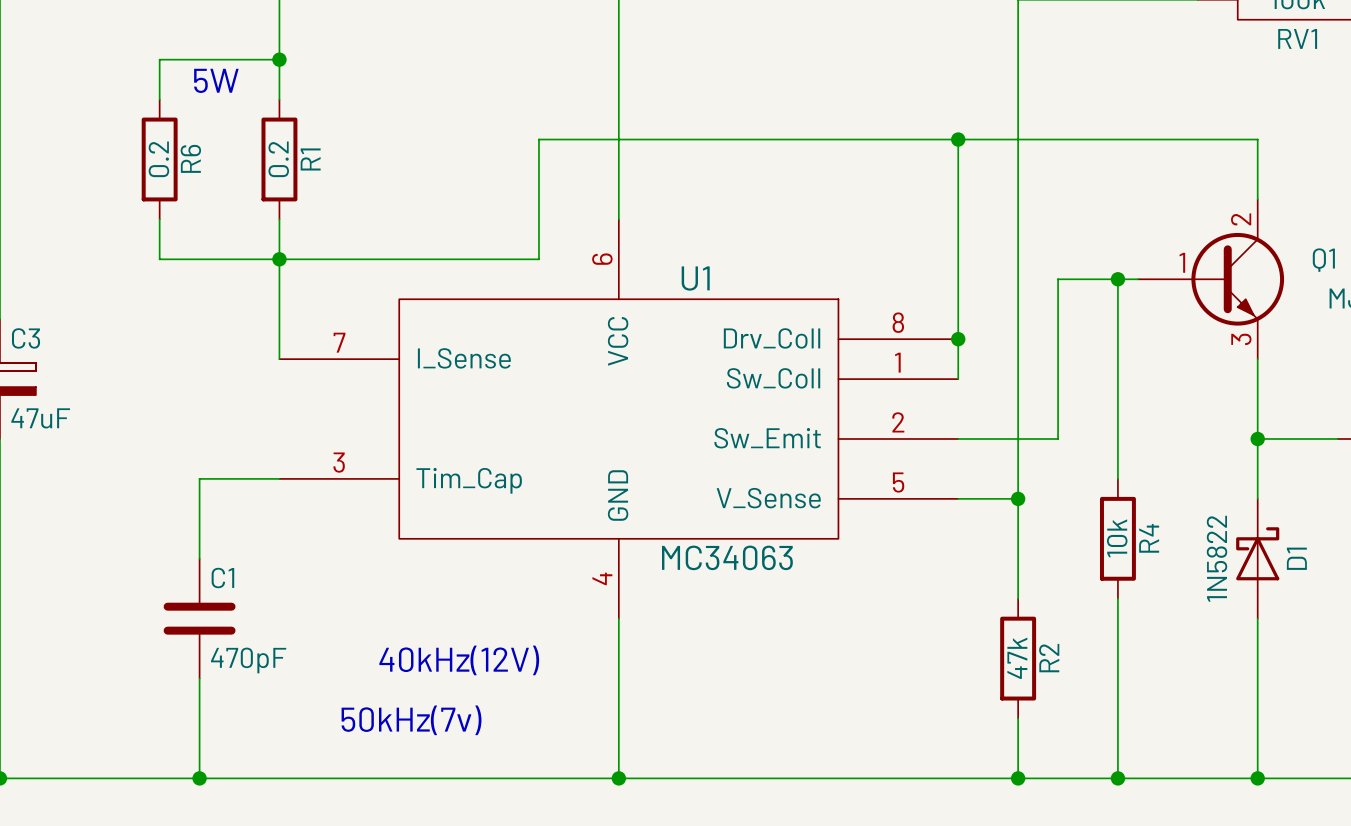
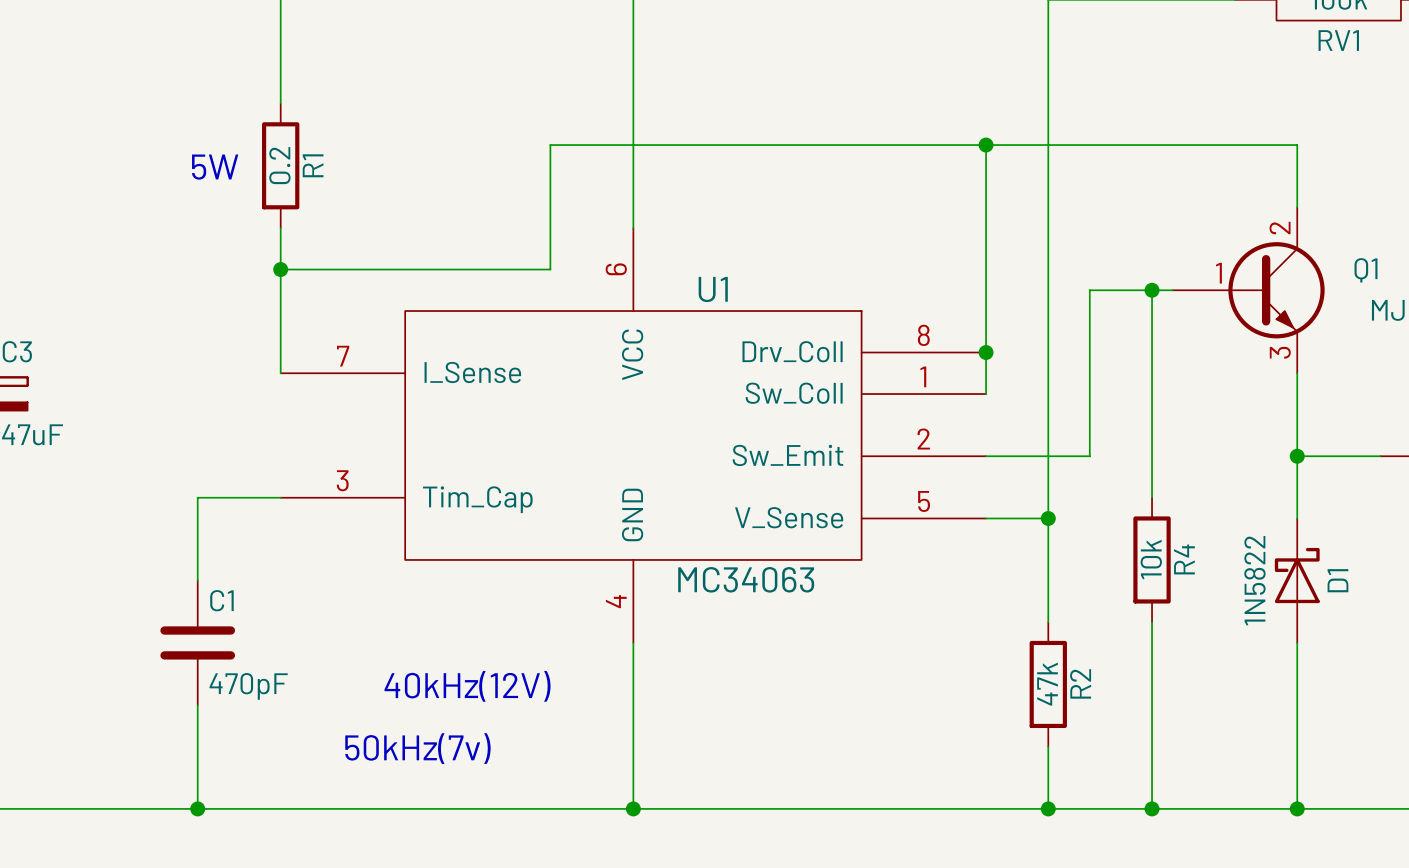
wire: (279, 59) (159, 59) (159, 99) -> none
junction: (279, 59) -> none
text position: 5W (216, 80) -> 5W (215, 167)
R6: 0.2 (159, 159) -> none
wire: (159, 219) (159, 259) (279, 259) -> none

